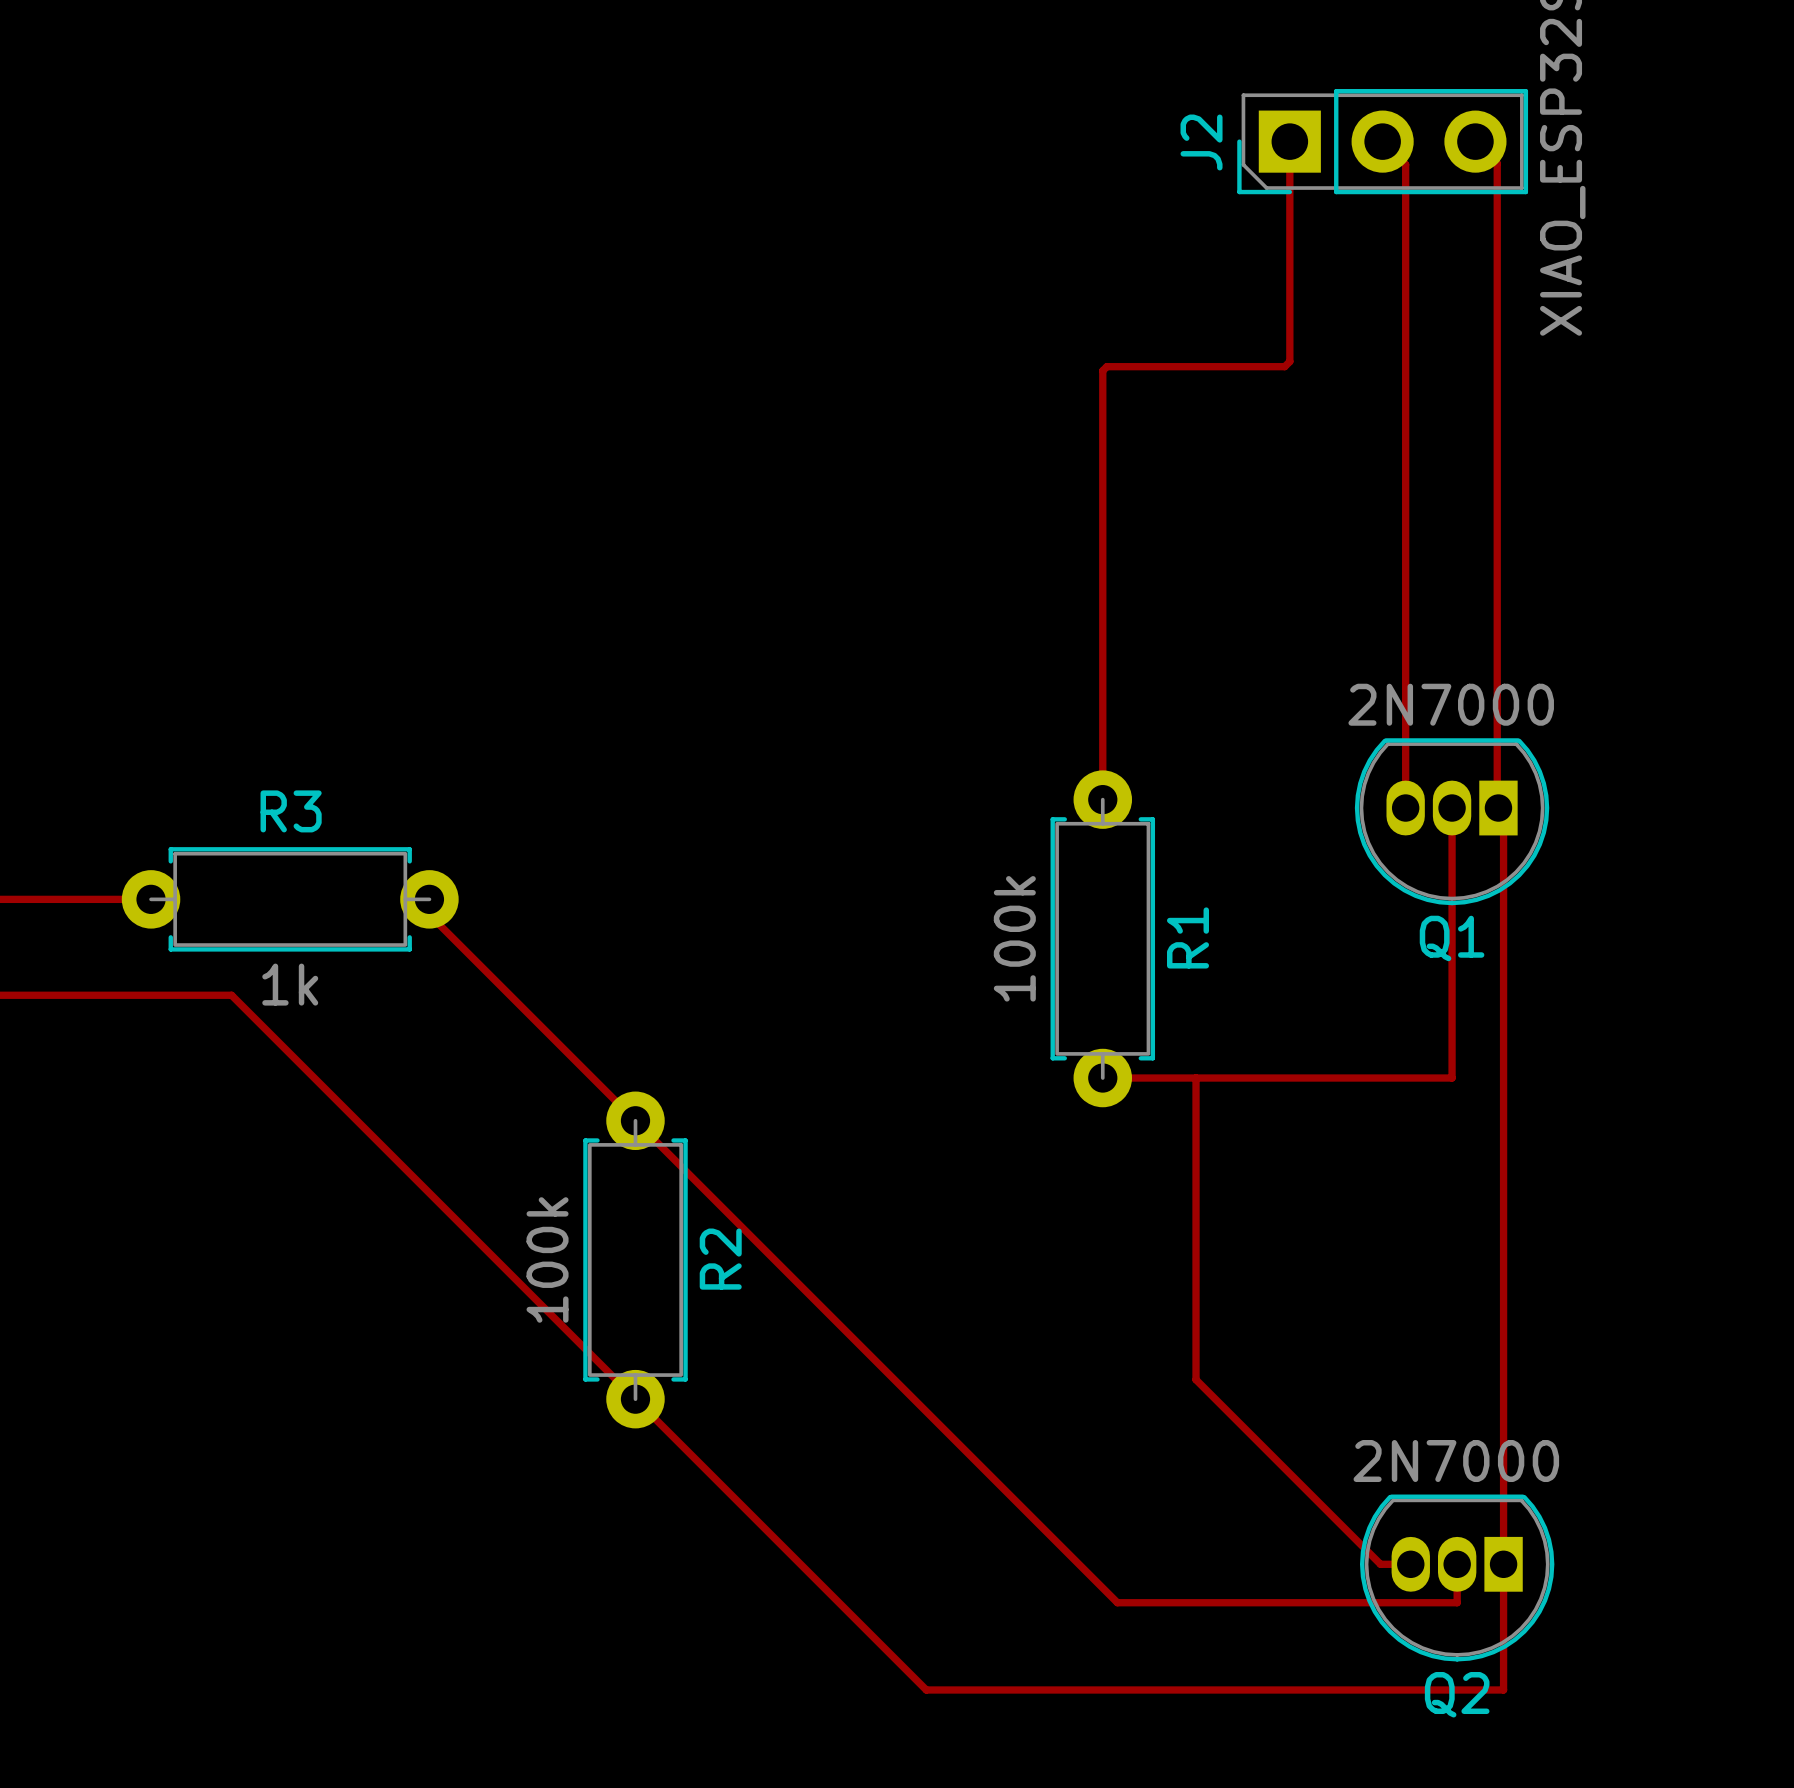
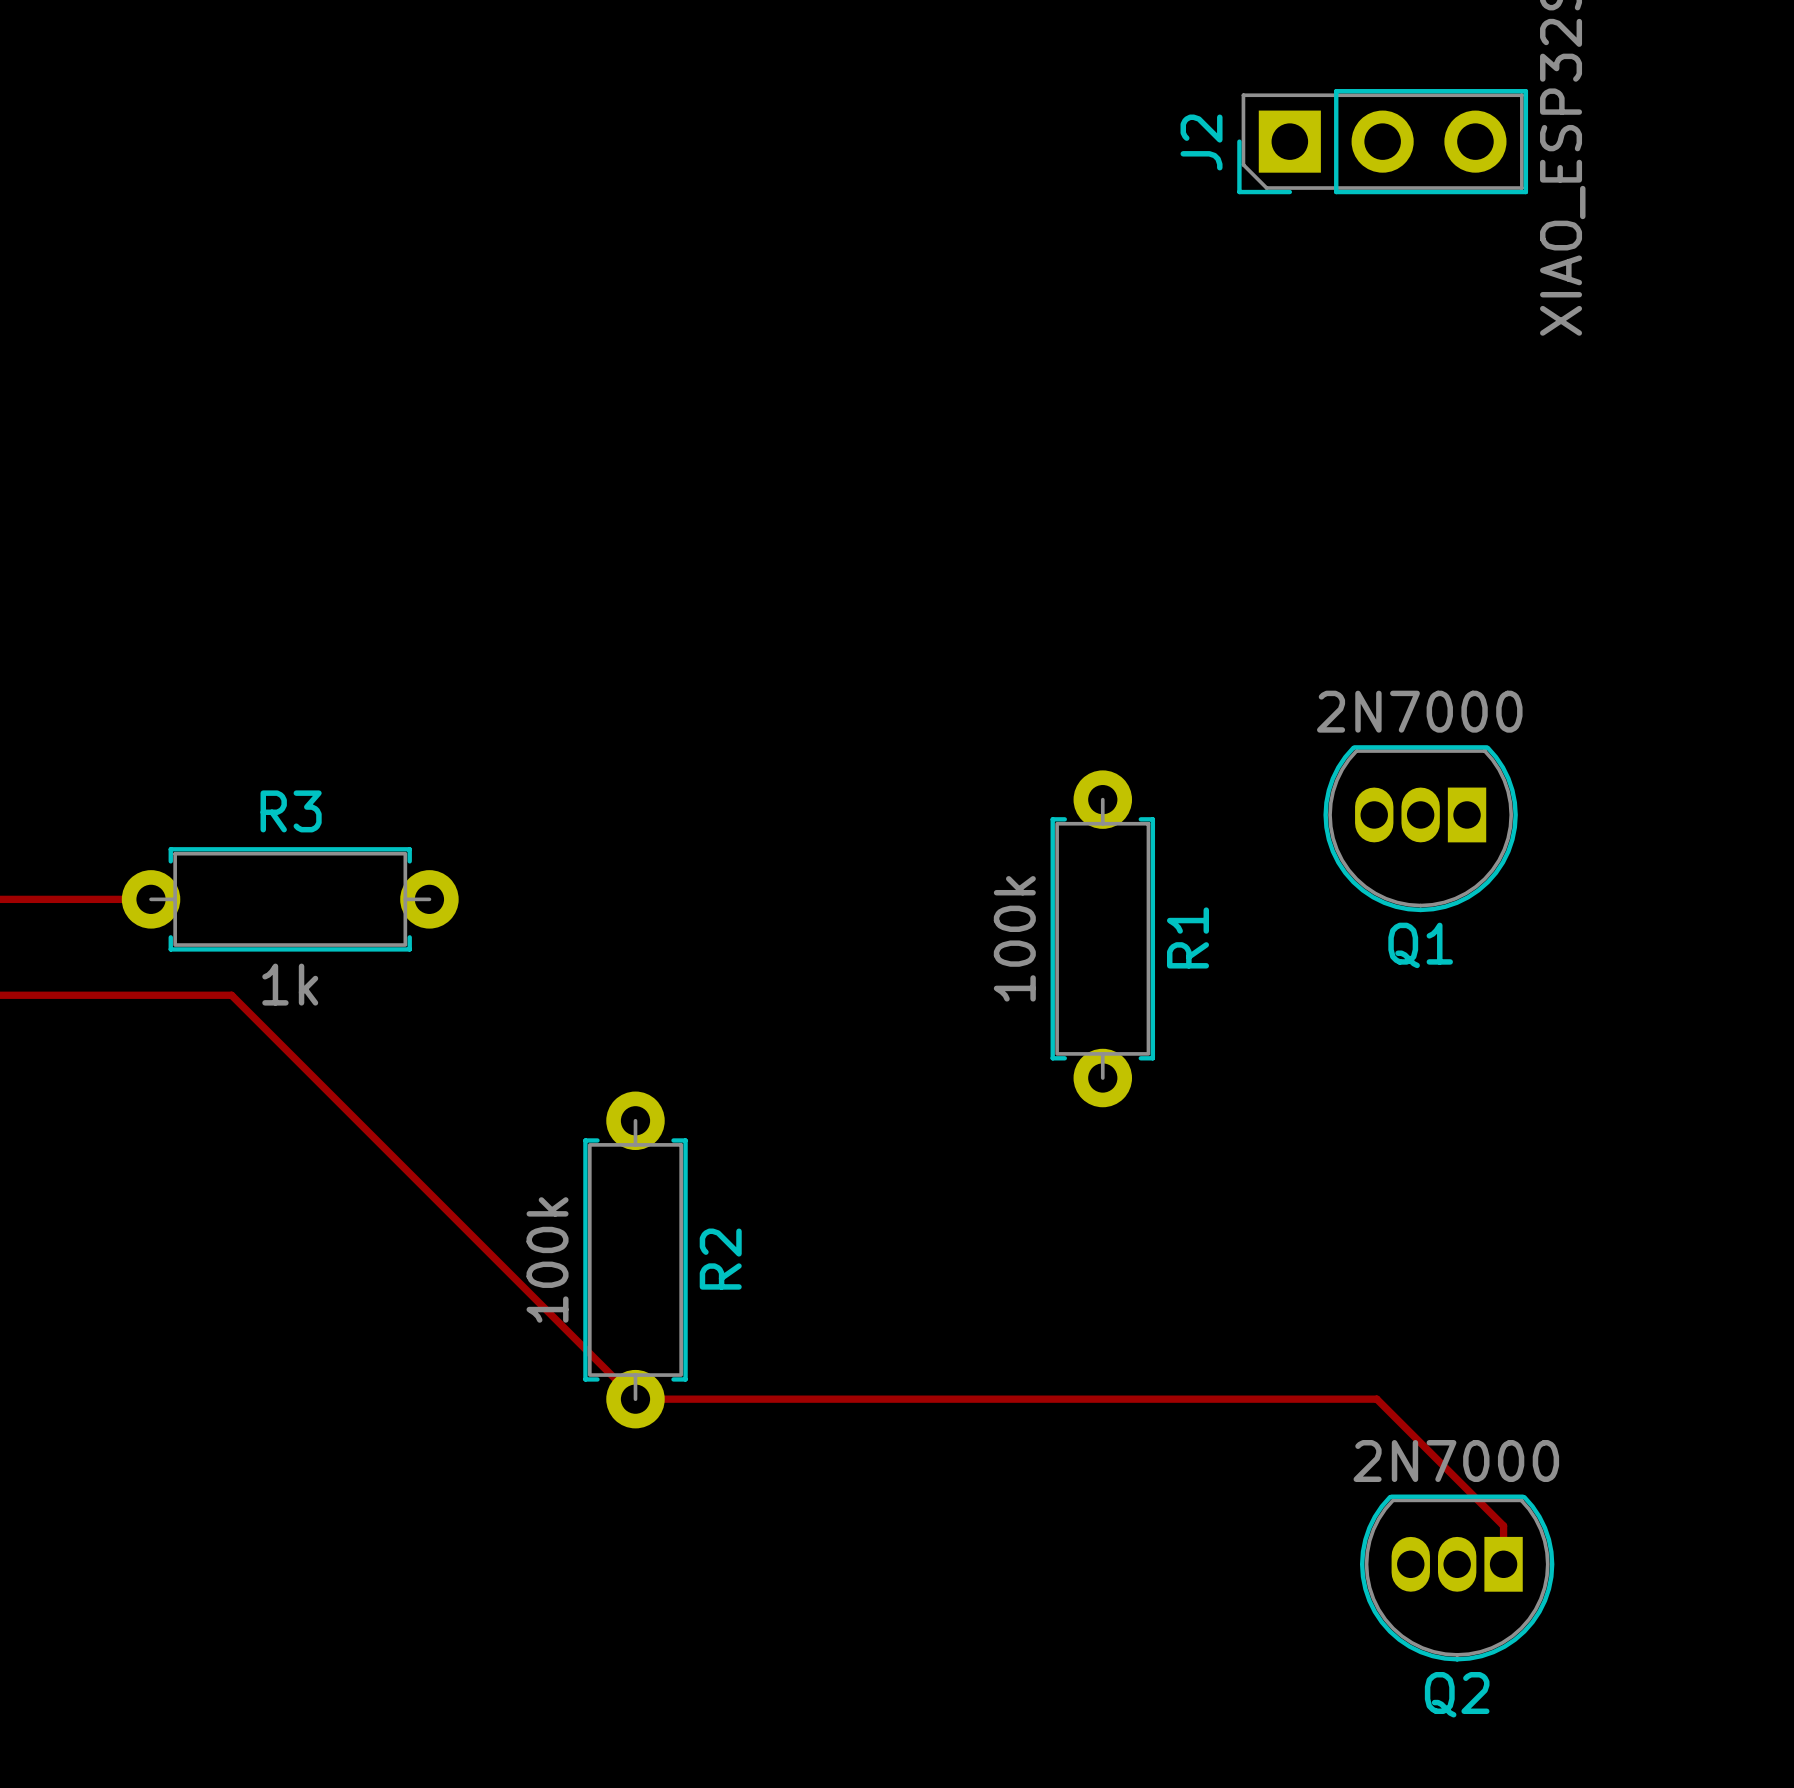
track: (1289, 141) (1289, 361) (1284, 366) (1106, 366) (1102, 370) (1102, 799) -> none
track: (1382, 141) (1405, 164) (1405, 808) -> none
track: (1475, 141) (1497, 163) (1497, 814) -> none
track: (1452, 808) (1452, 1078) (1102, 1078) -> none
Q1 position: (1452, 821) -> (1420, 828)
track: (1503, 821) (1503, 1525) -> none
track: (429, 914) (1117, 1602) (1457, 1602) (1457, 1564) -> none
track: (1196, 1078) (1196, 1379) (1380, 1564) (1410, 1564) -> none
track: (635, 1399) (926, 1689) (1503, 1689) (1503, 1564) -> (635, 1399) (1376, 1399) (1503, 1525)

